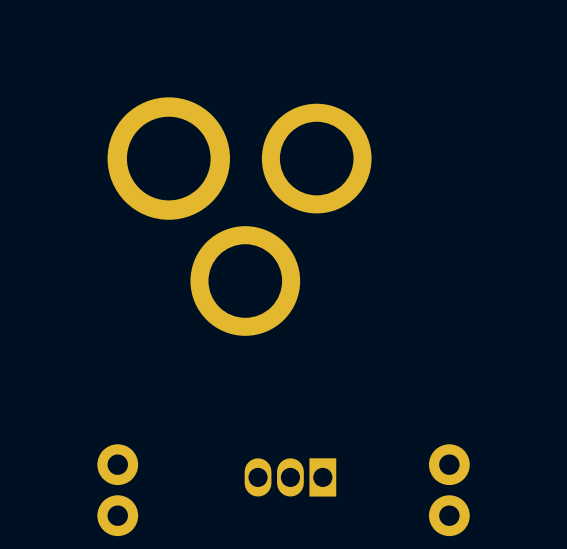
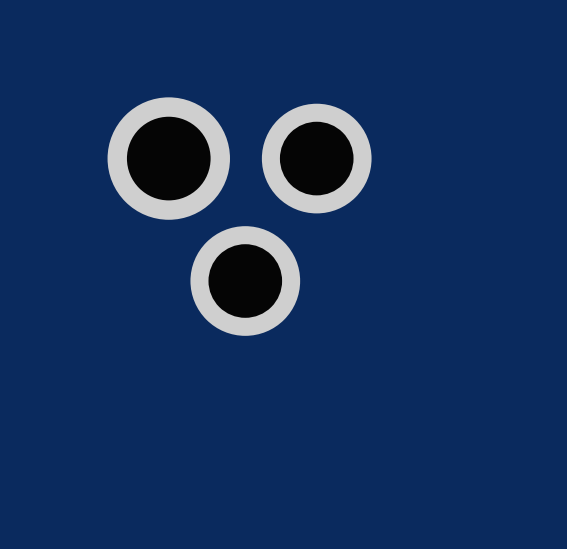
part: (290, 477) -> none
part: (117, 490) -> none
part: (449, 490) -> none

